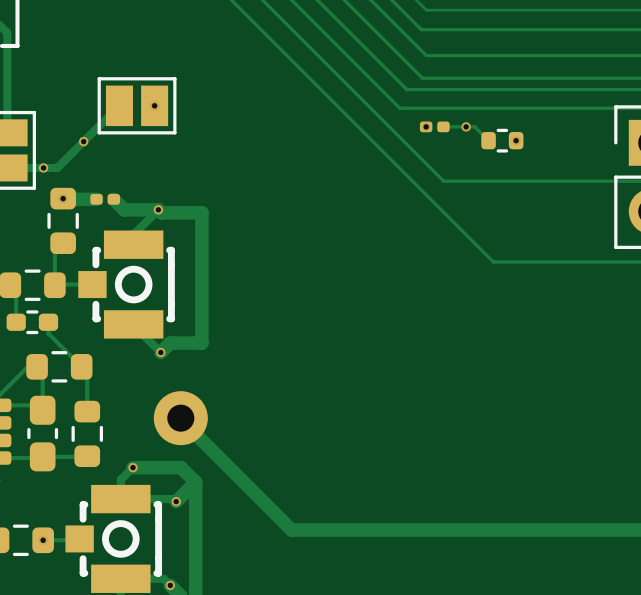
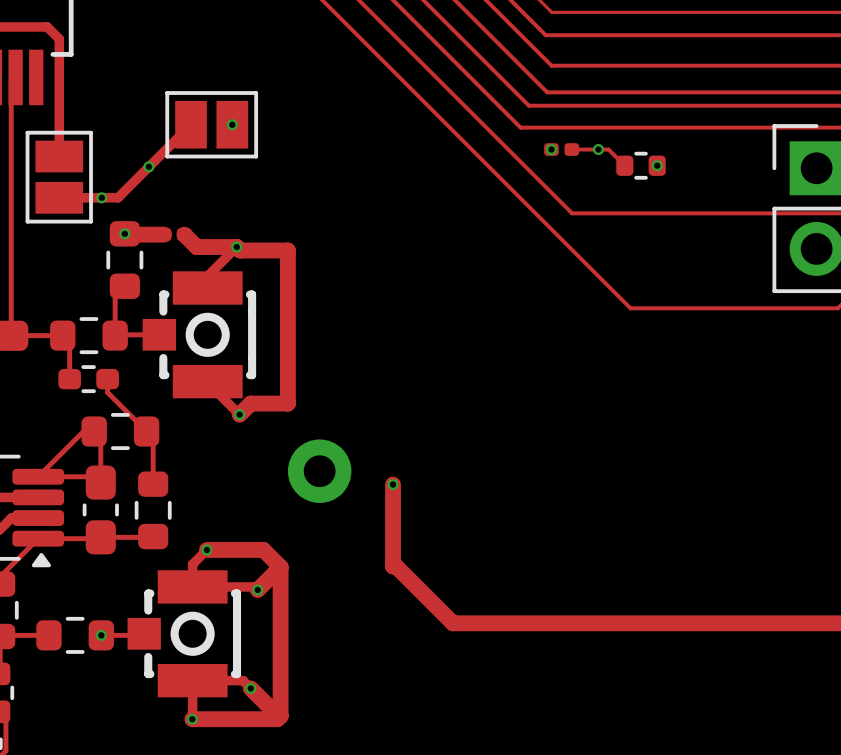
via: none -> (393, 484)
track: (180, 418) (291, 530) (342, 530) -> (393, 484) (393, 566) (396, 566) (453, 623)
part position: (180, 418) -> (319, 471)

